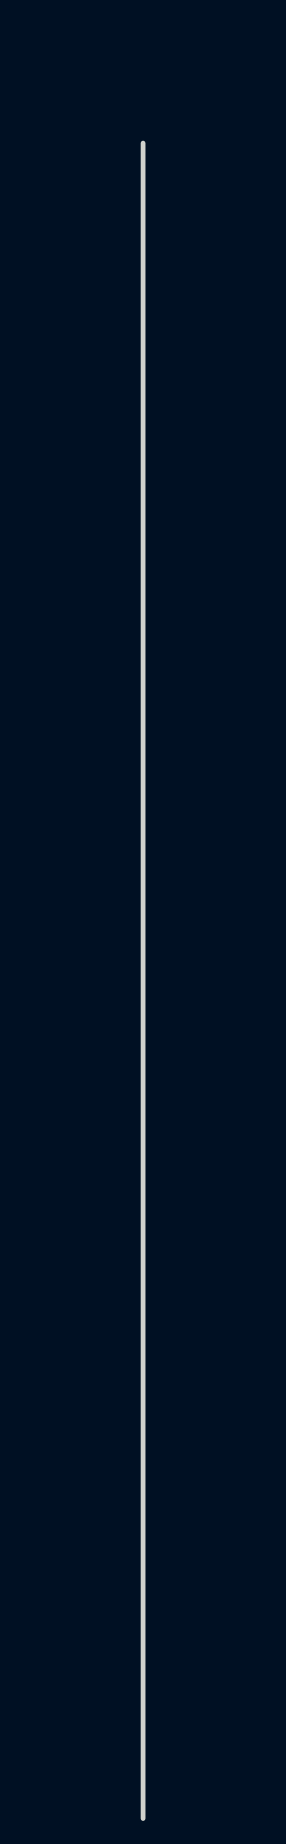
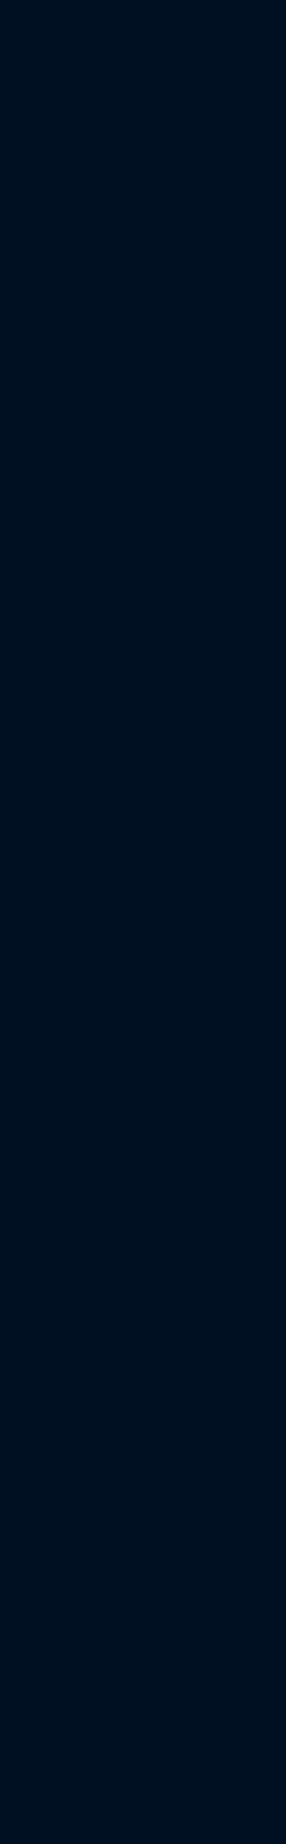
board edge: (143, 143) (143, 1818) -> none

